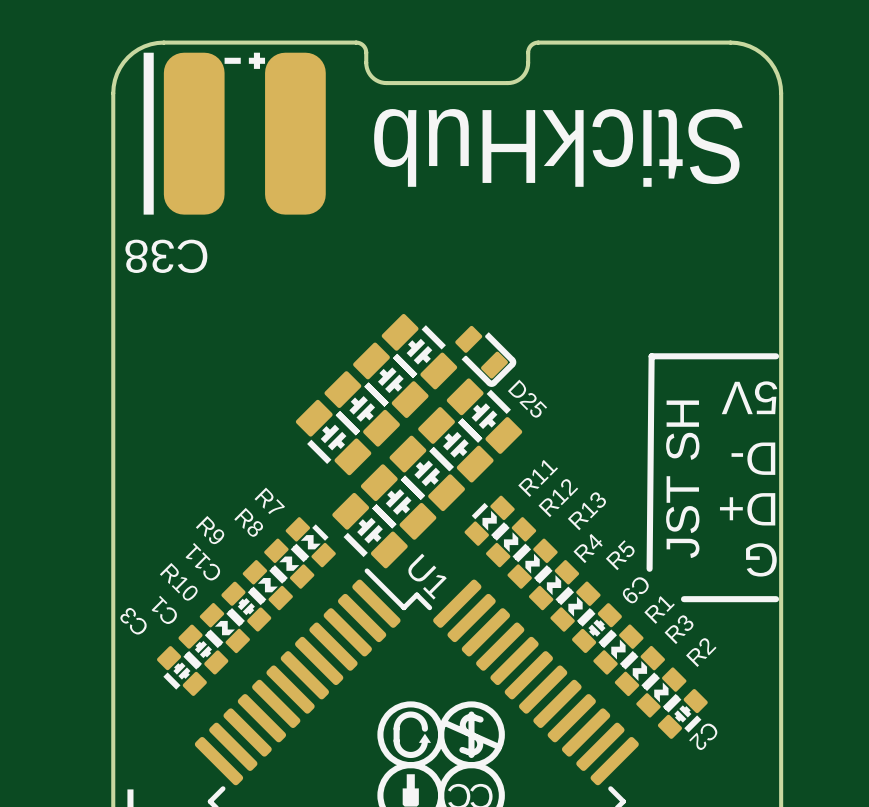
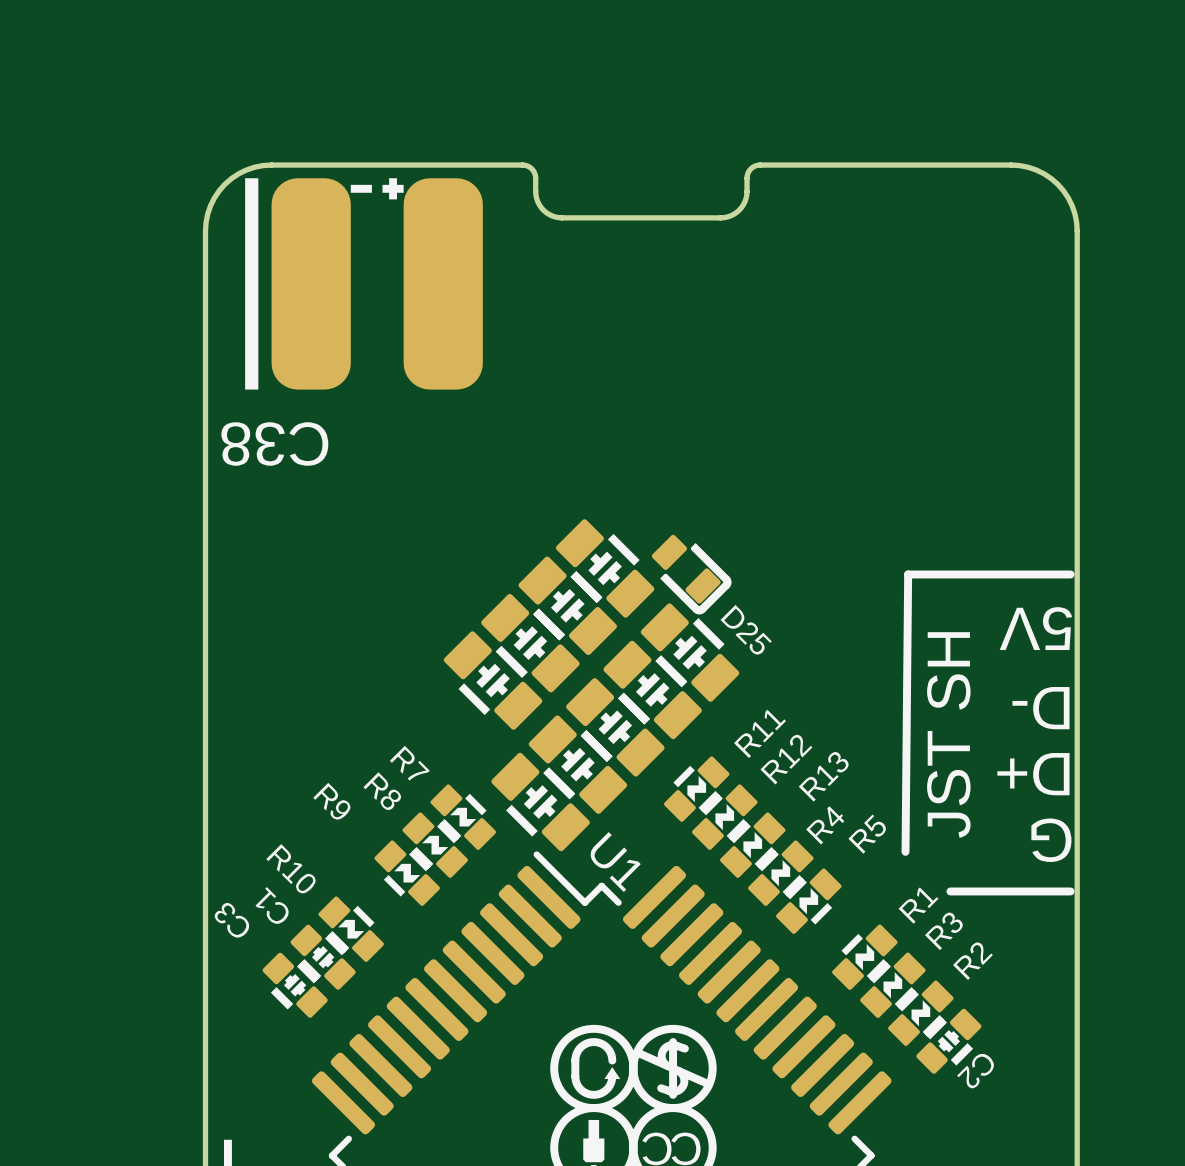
text: StickHub (558, 147) -> none
C11: (246, 606) -> none
C9: (596, 628) -> none

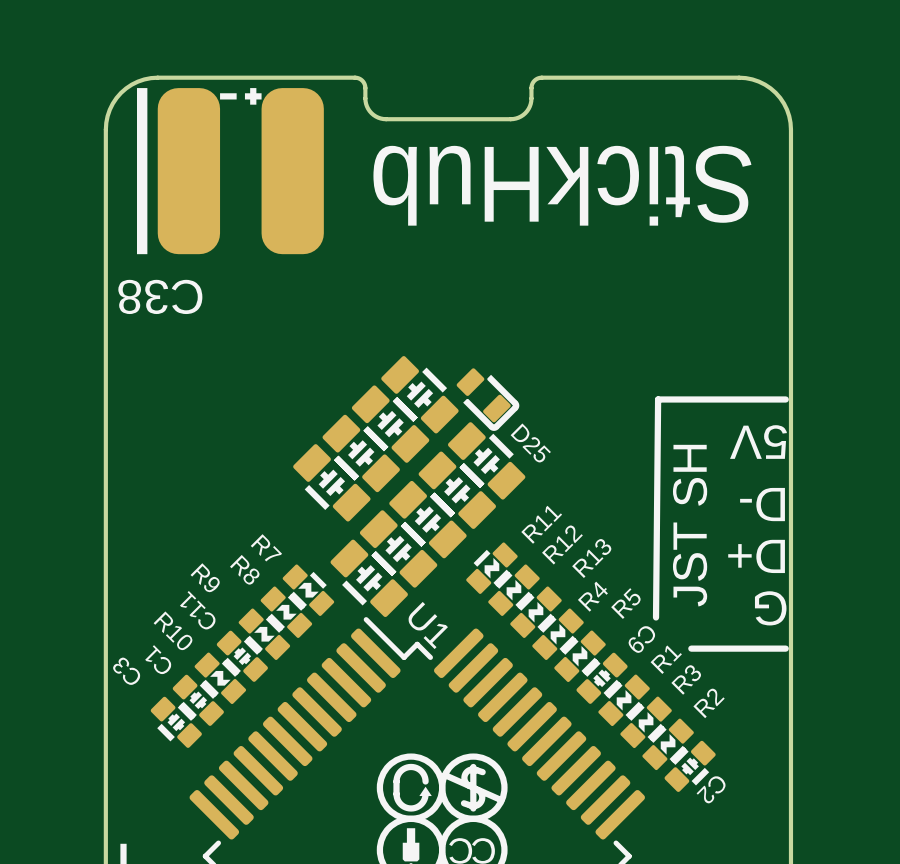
text: none -> StickHub (562, 185)
C11: none -> (242, 656)
C9: none -> (602, 678)

